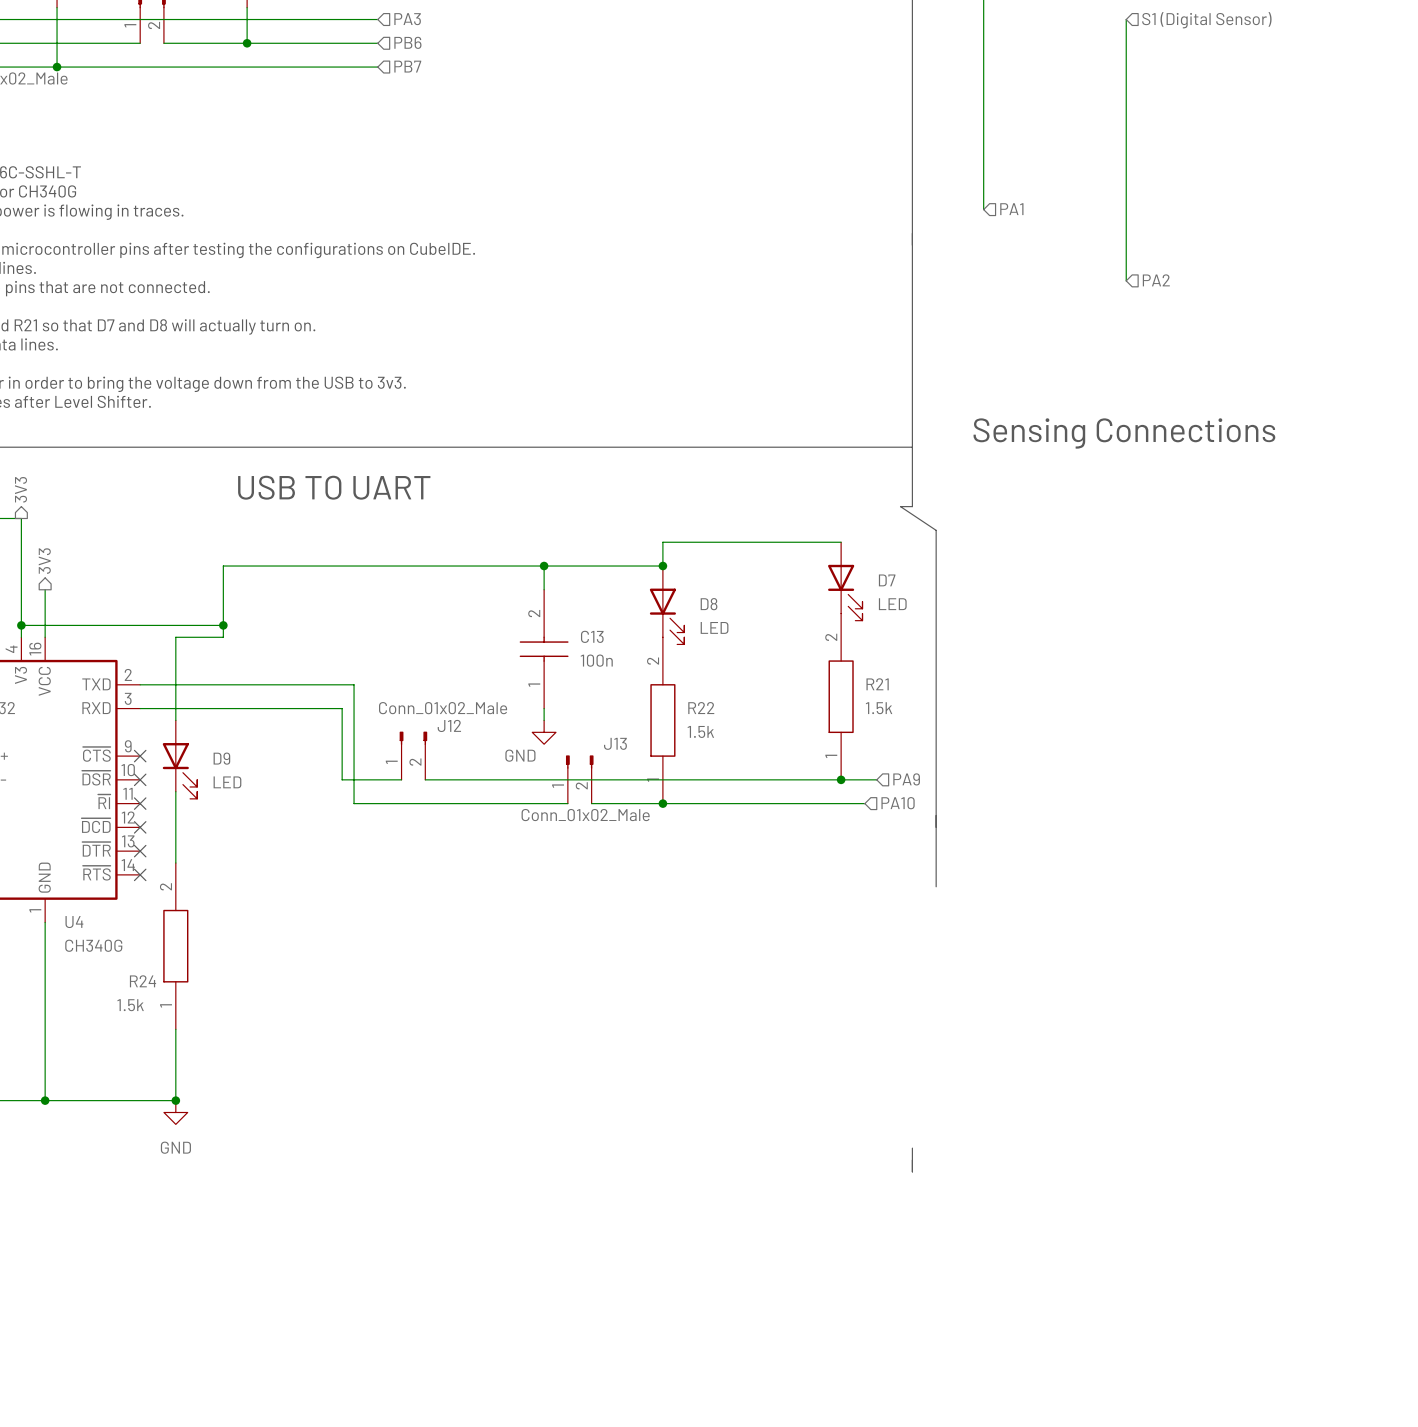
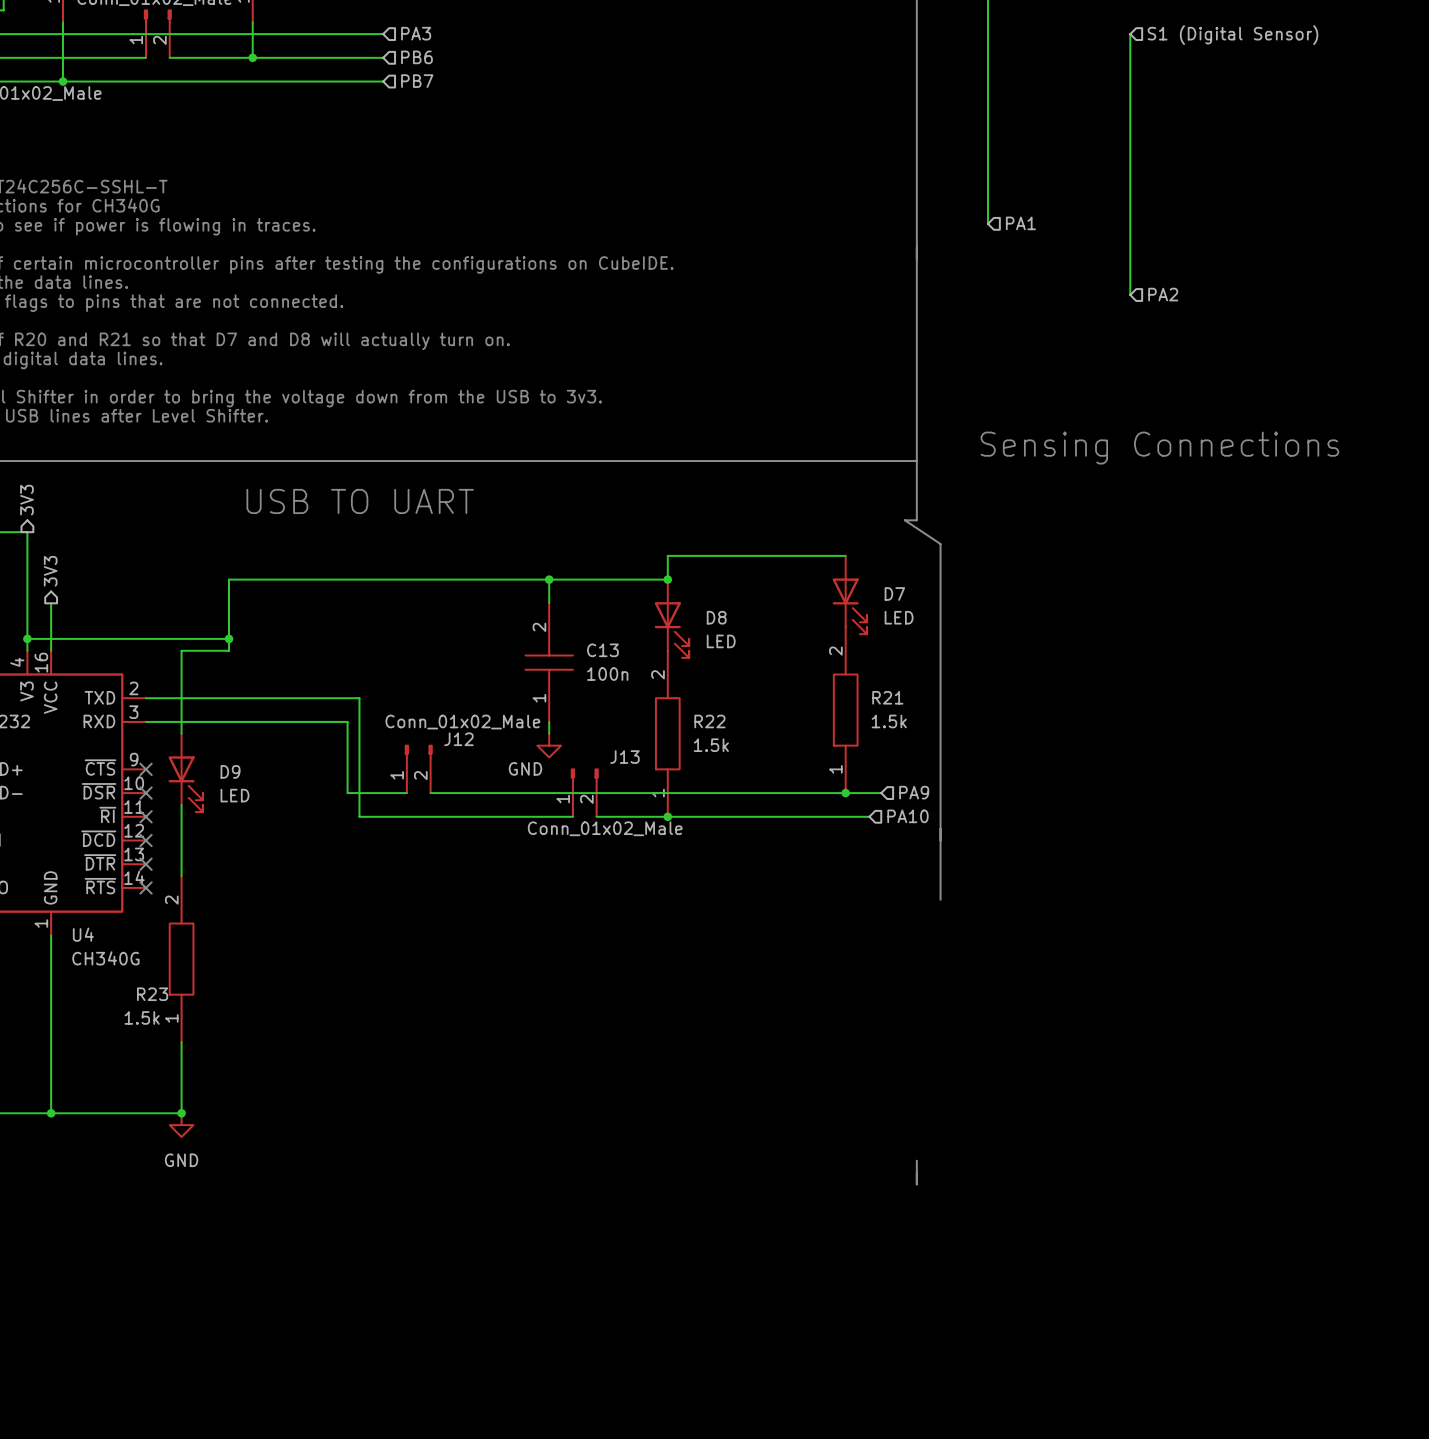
R24 name: R24 (143, 981) -> R23 (152, 994)

